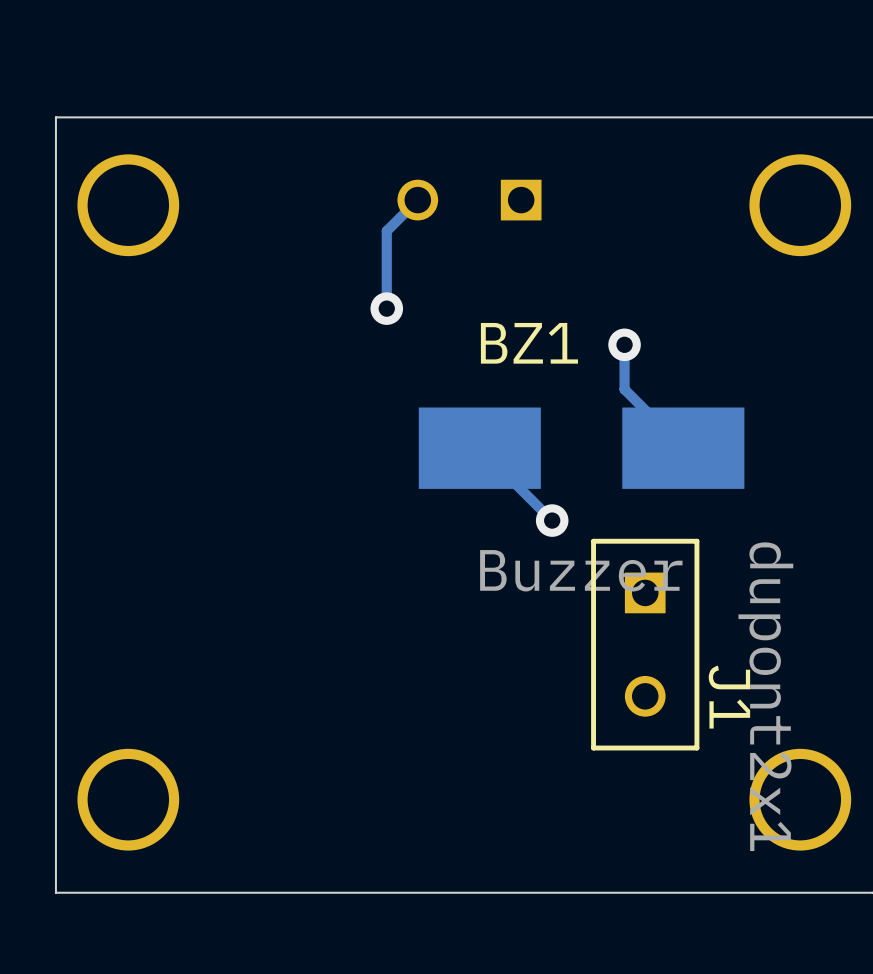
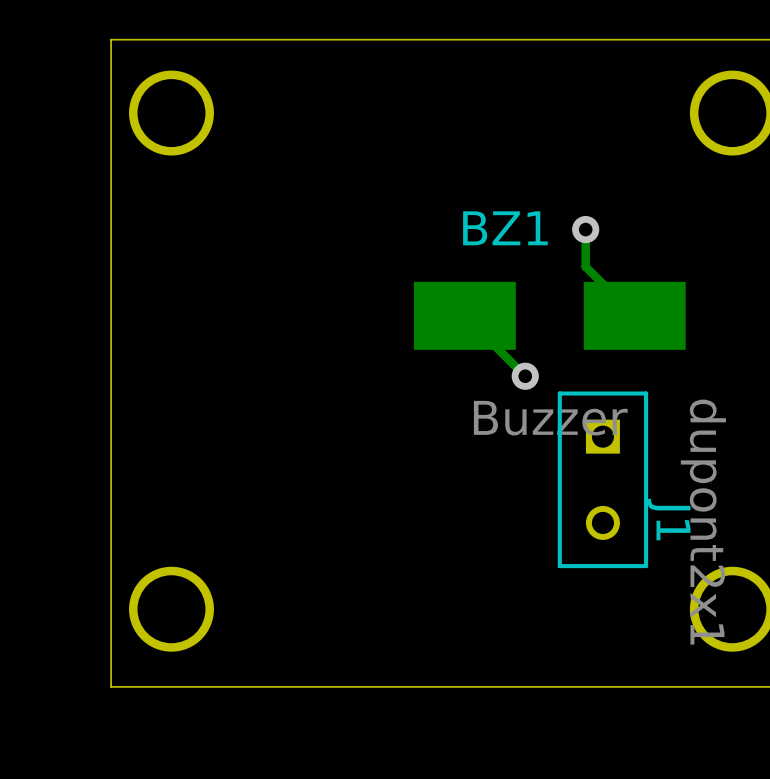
track: (417, 200) (386, 231) (386, 308) -> none
part: (469, 200) -> none
via: (386, 308) -> none

